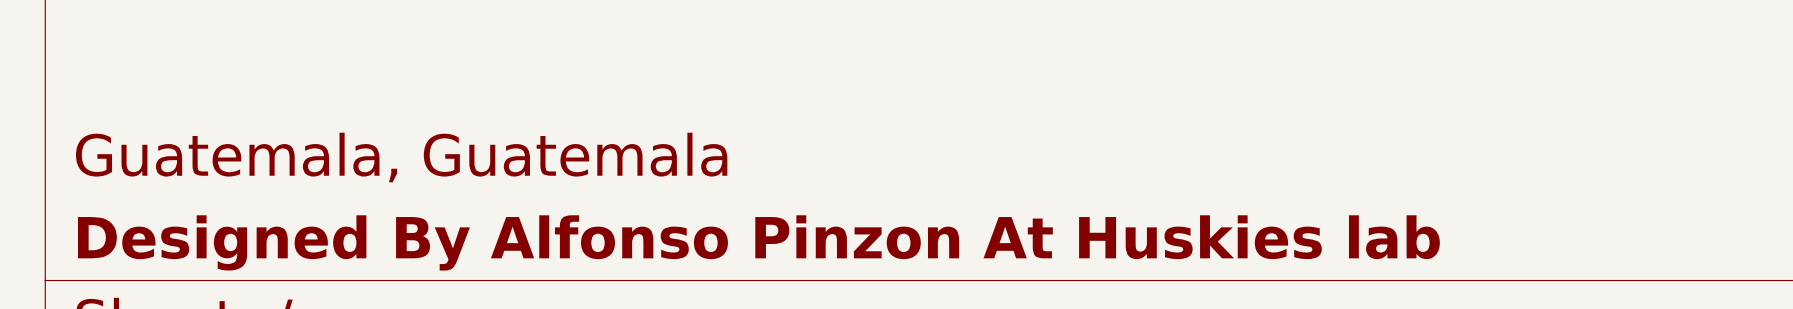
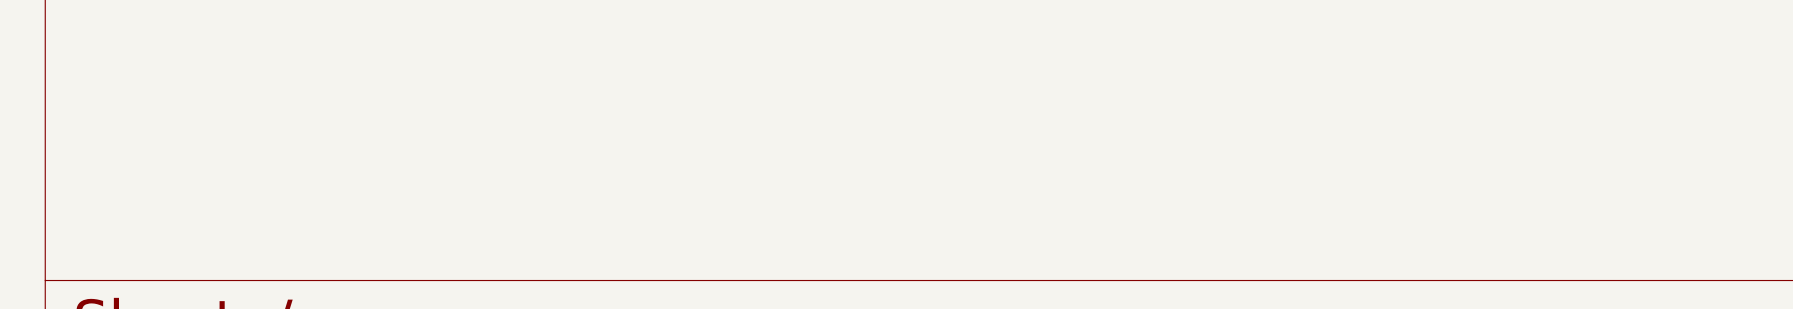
title block: Guatemala, Guatemala (401, 157) -> none
title block: Designed By Alfonso Pinzon At Huskies lab (758, 242) -> none

